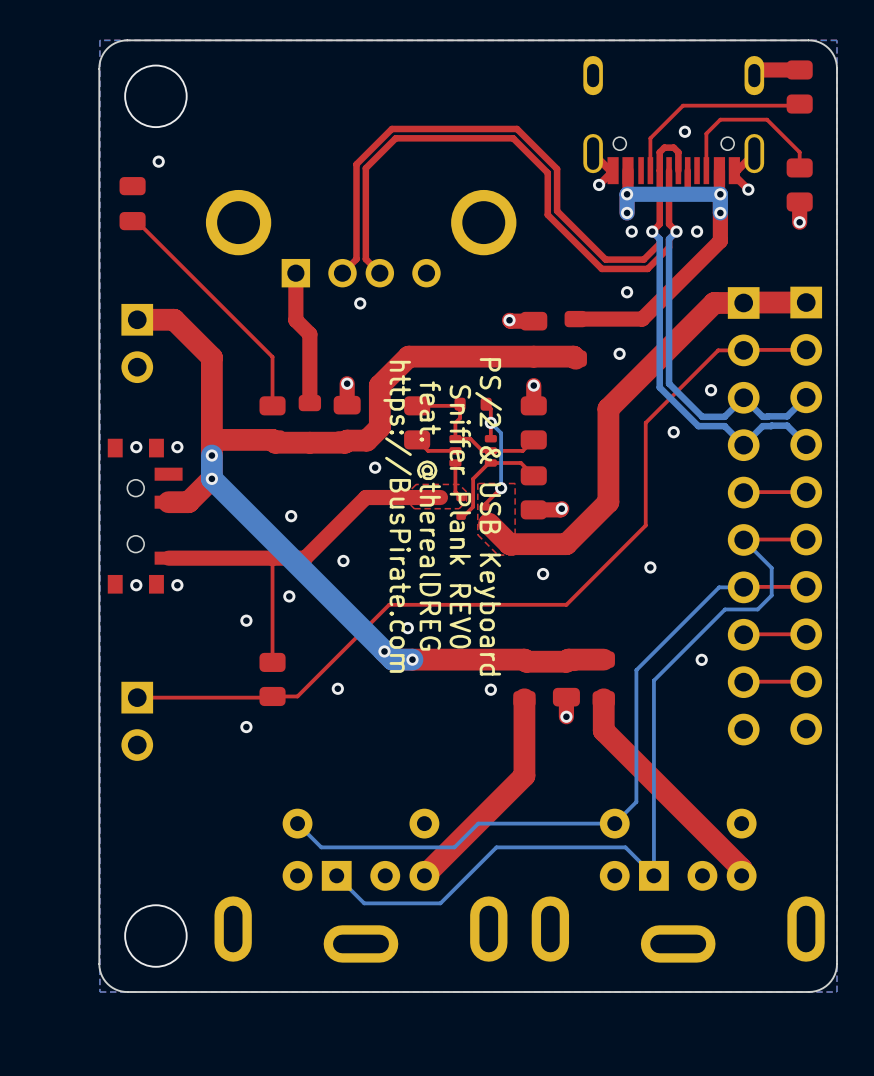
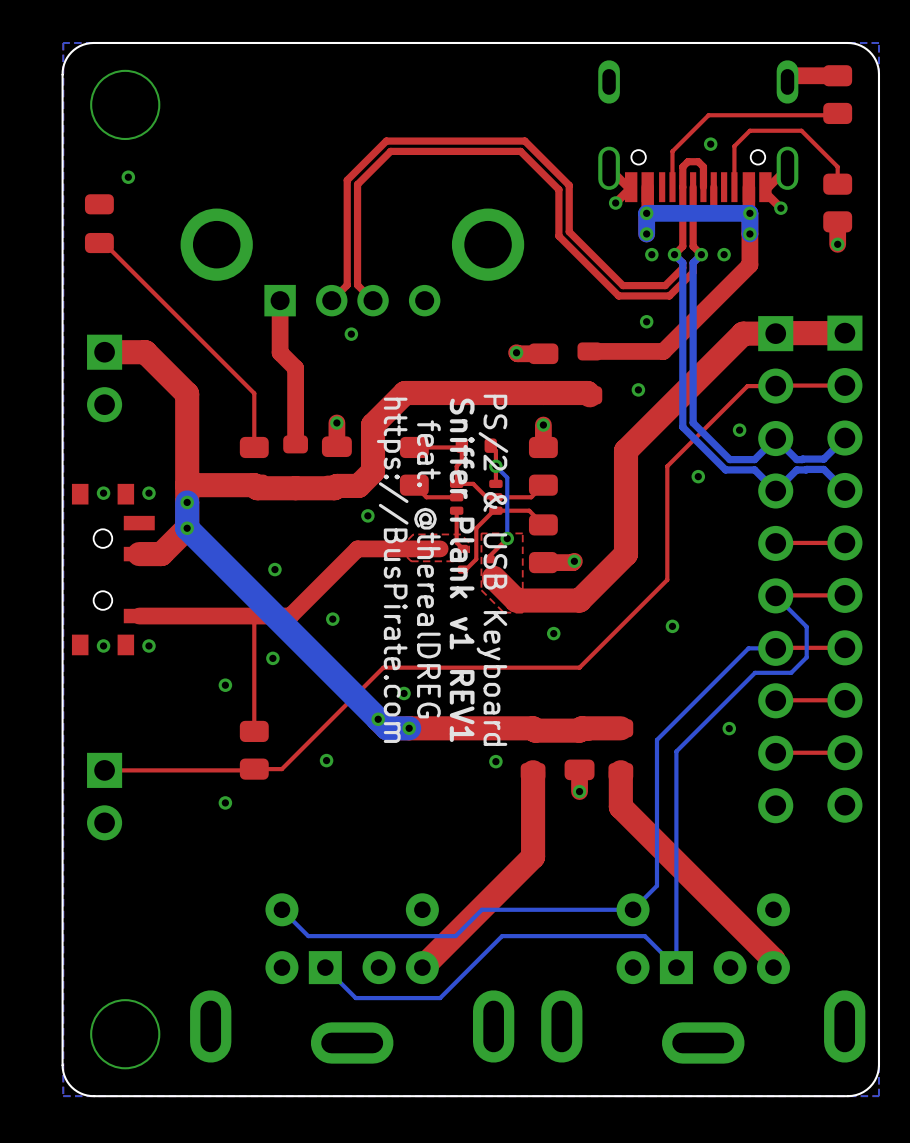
text: Sniffer Plank REV0 (460, 516) -> Sniffer Plank v1 REV1 (462, 570)

